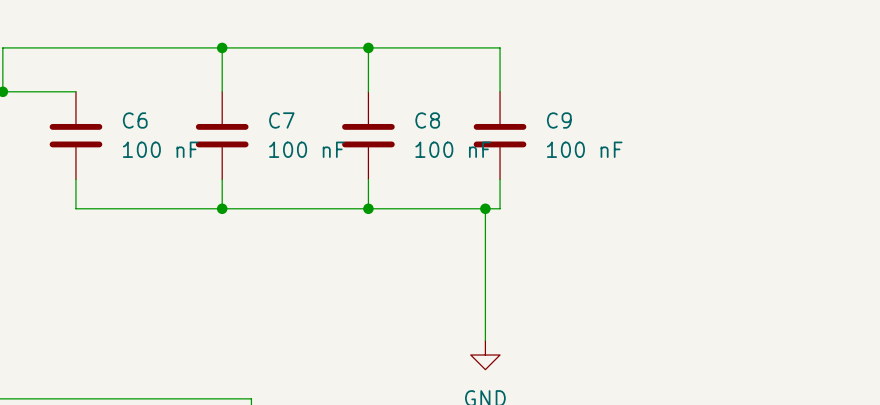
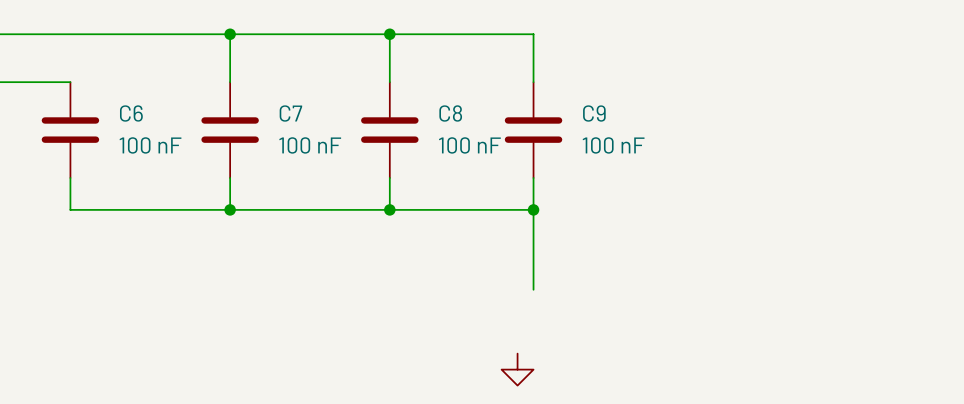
wire: (485, 208) (485, 340) -> none
junction position: (485, 208) -> (533, 209)
wire: none -> (533, 209) (533, 289)

